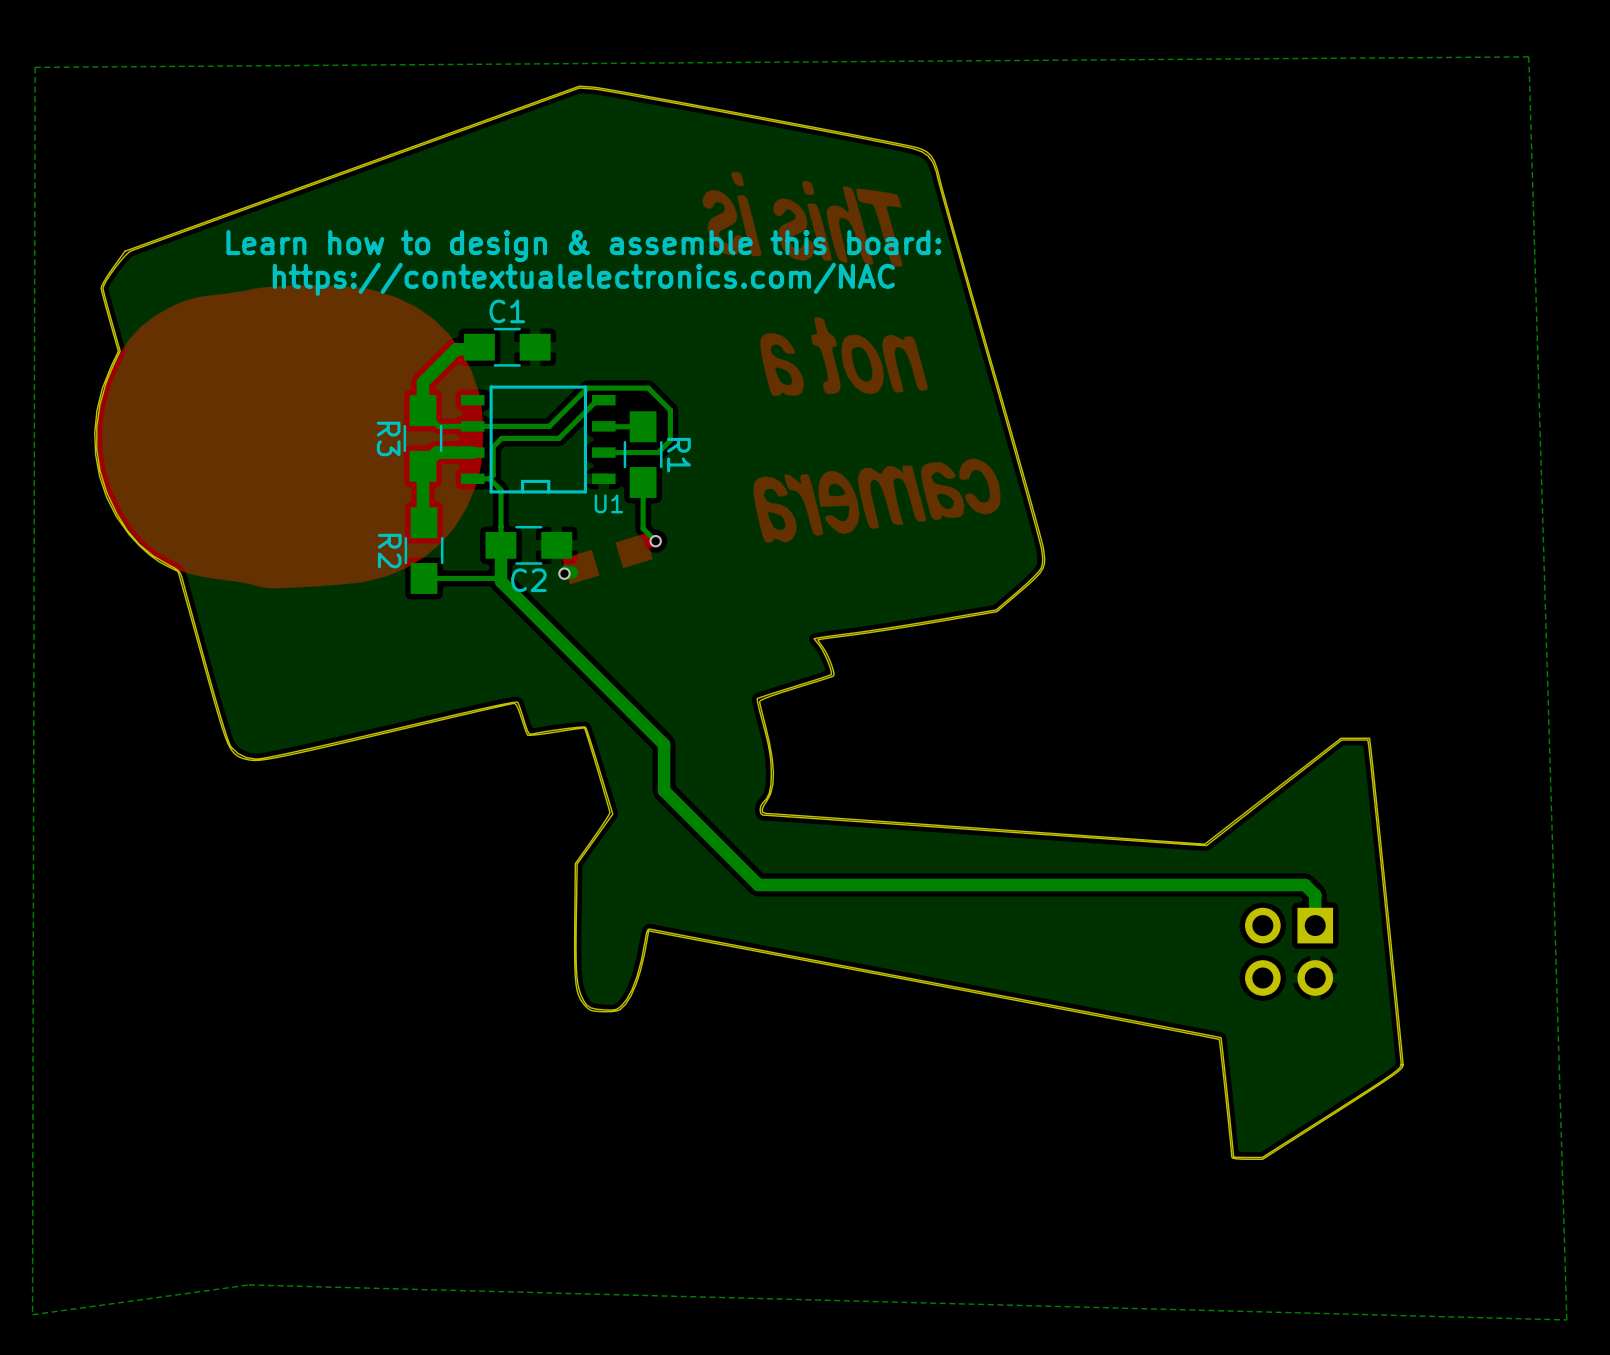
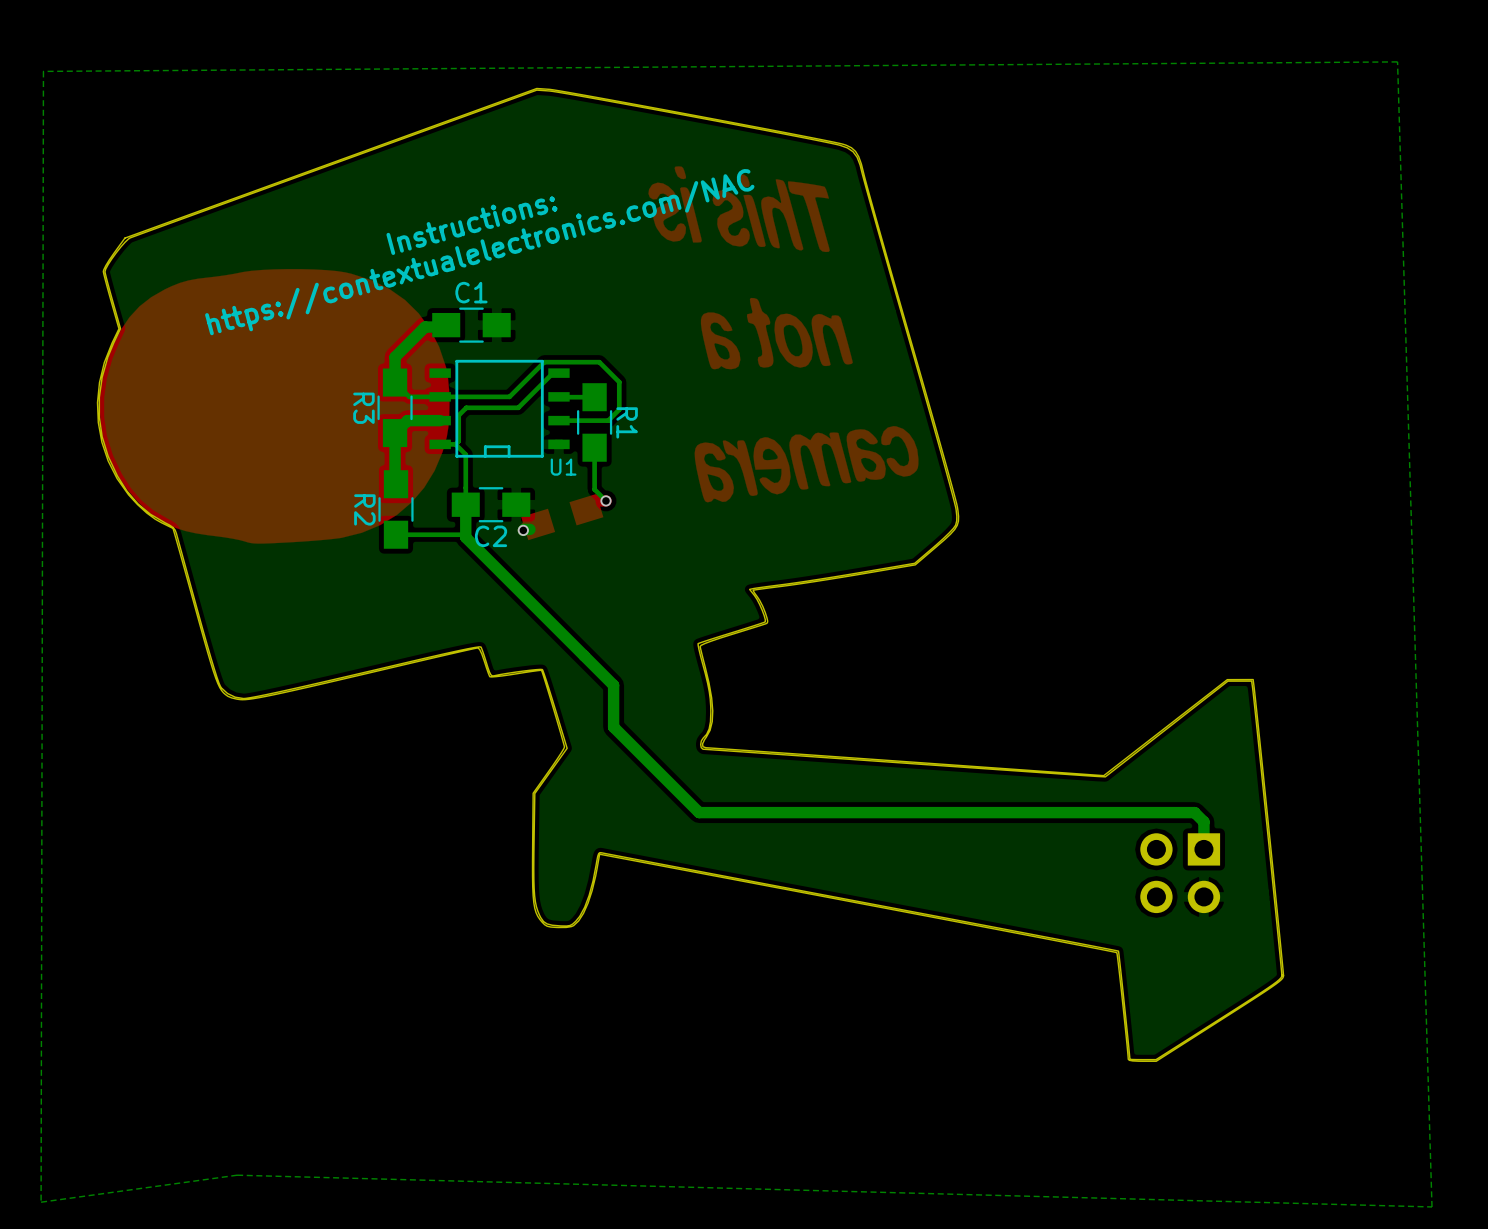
text: none -> Instructions: (471, 225)
text: Learn how to design & assemble this board: (583, 246) -> none
text rotation: 0° (583, 279) -> 15° counterclockwise (479, 252)

